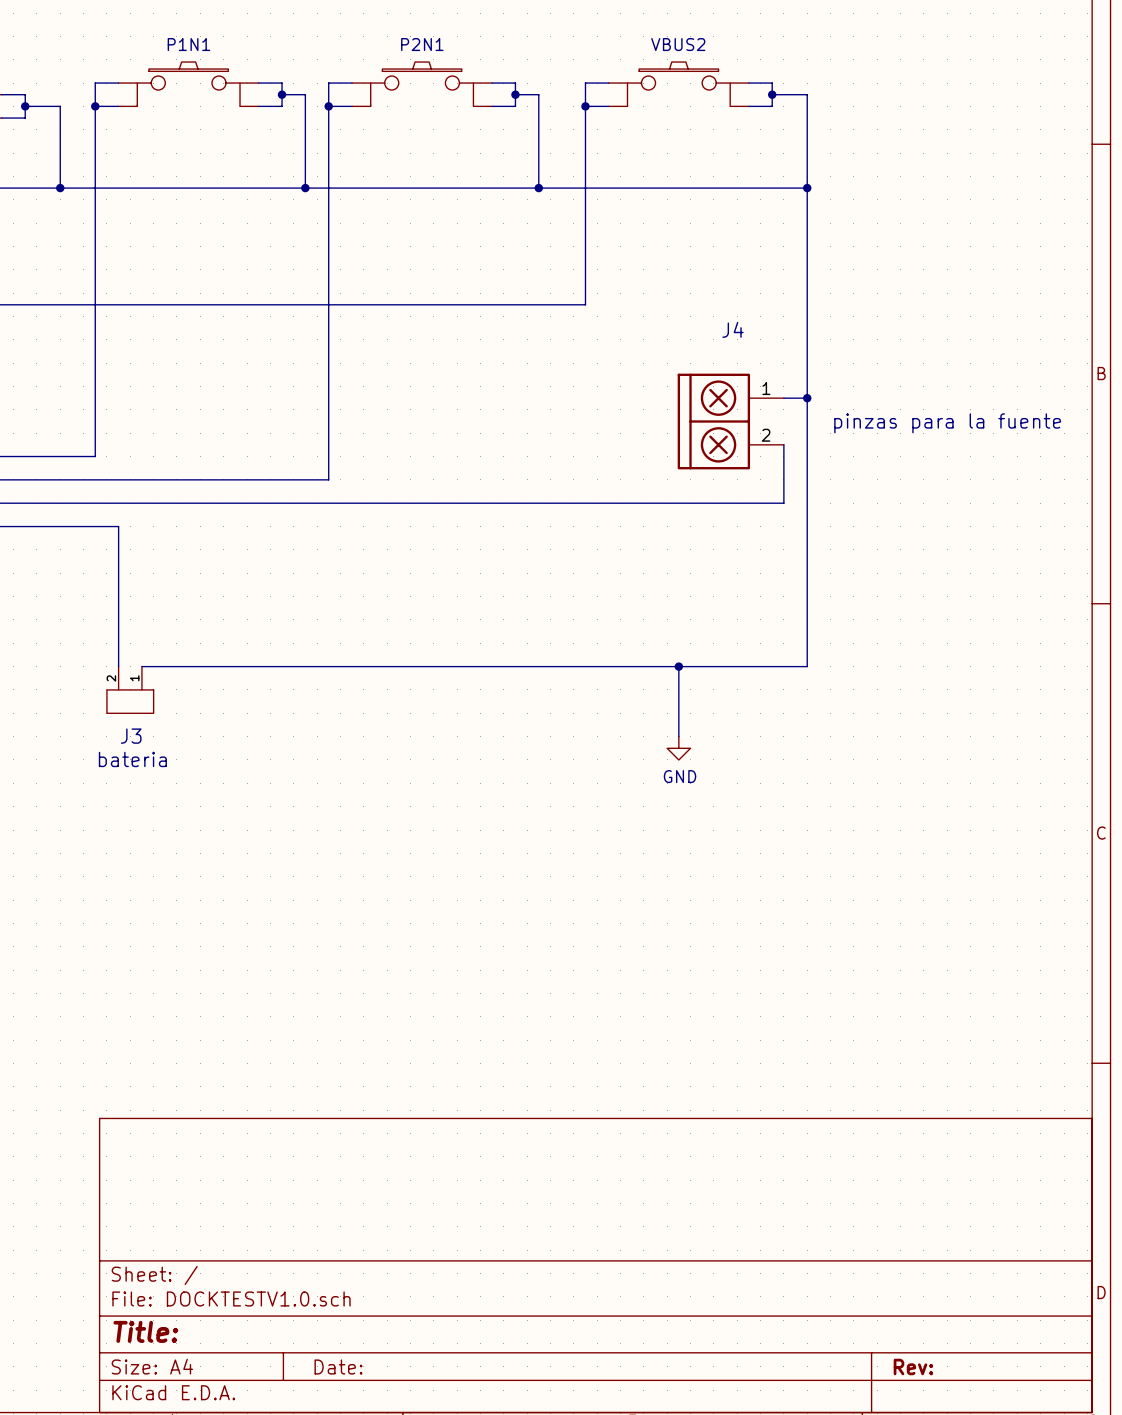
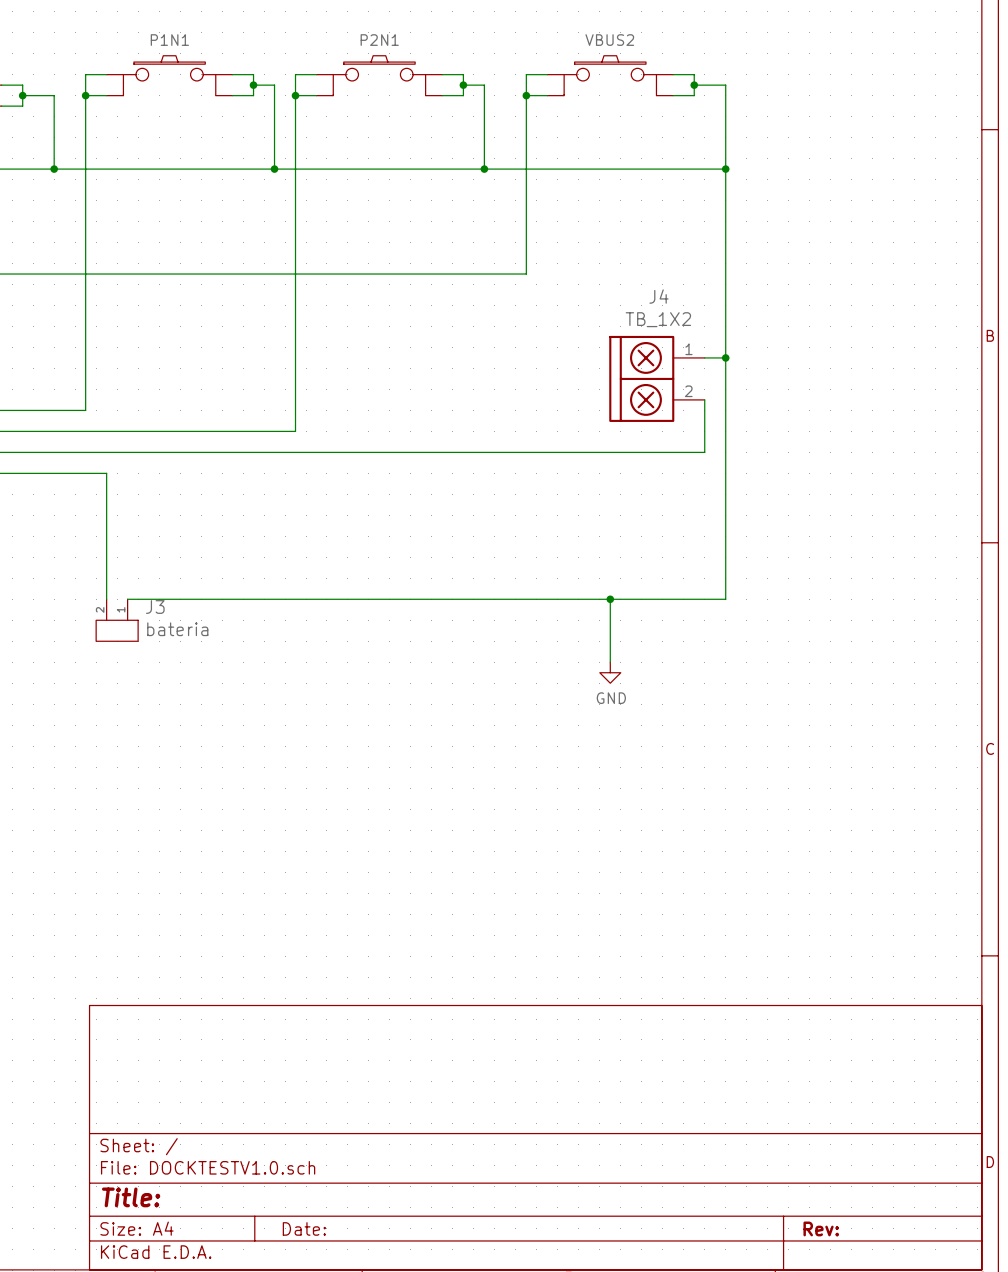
J4 value: pinzas para la fuente (947, 423) -> TB_1X2 (658, 319)
J3 name position: J3 (131, 736) -> J3 (155, 607)
J3 value position: bateria (132, 759) -> bateria (177, 629)

